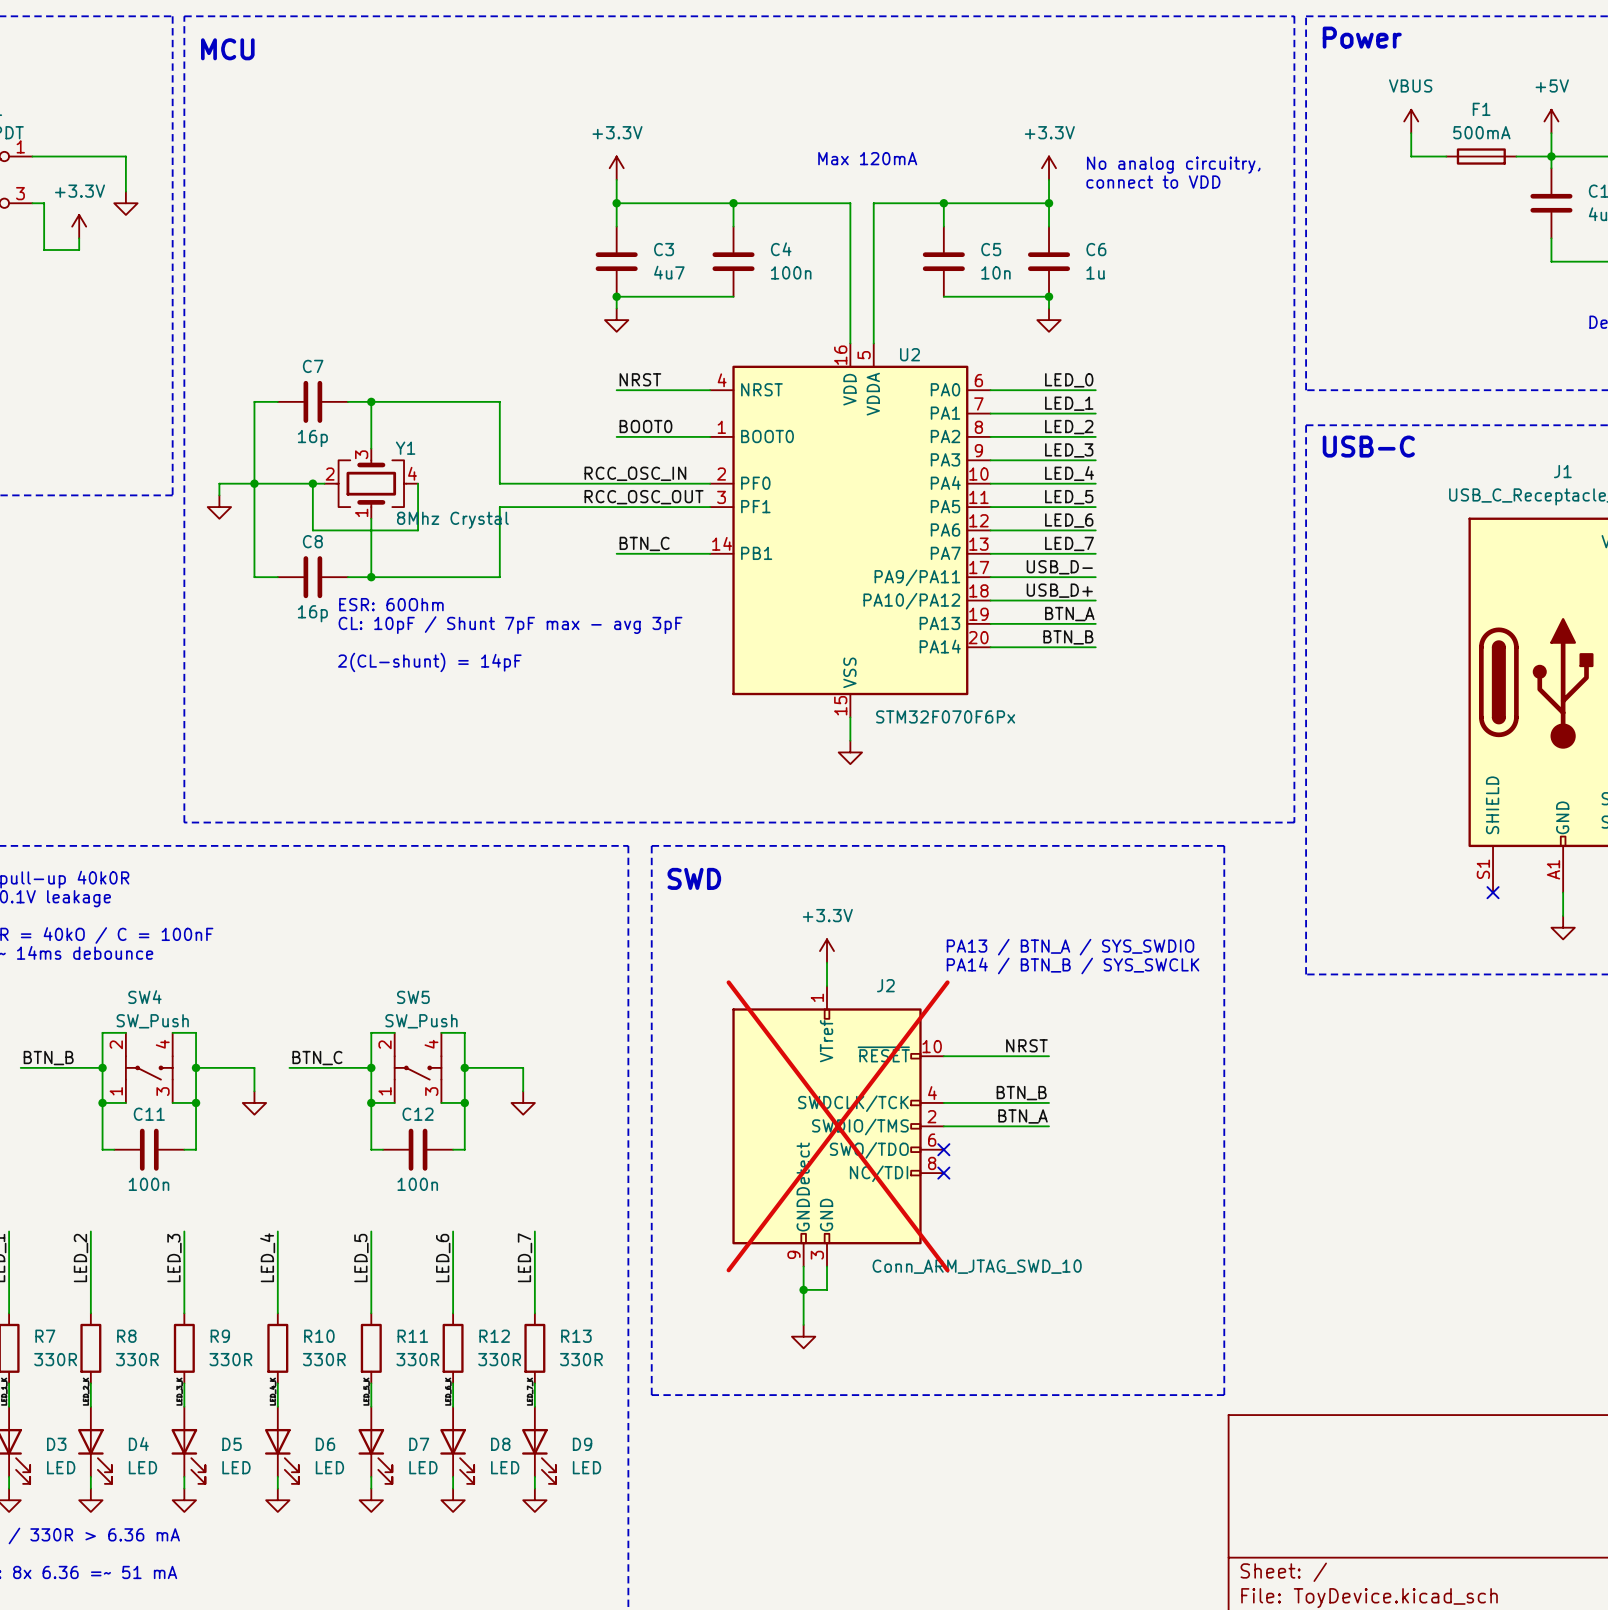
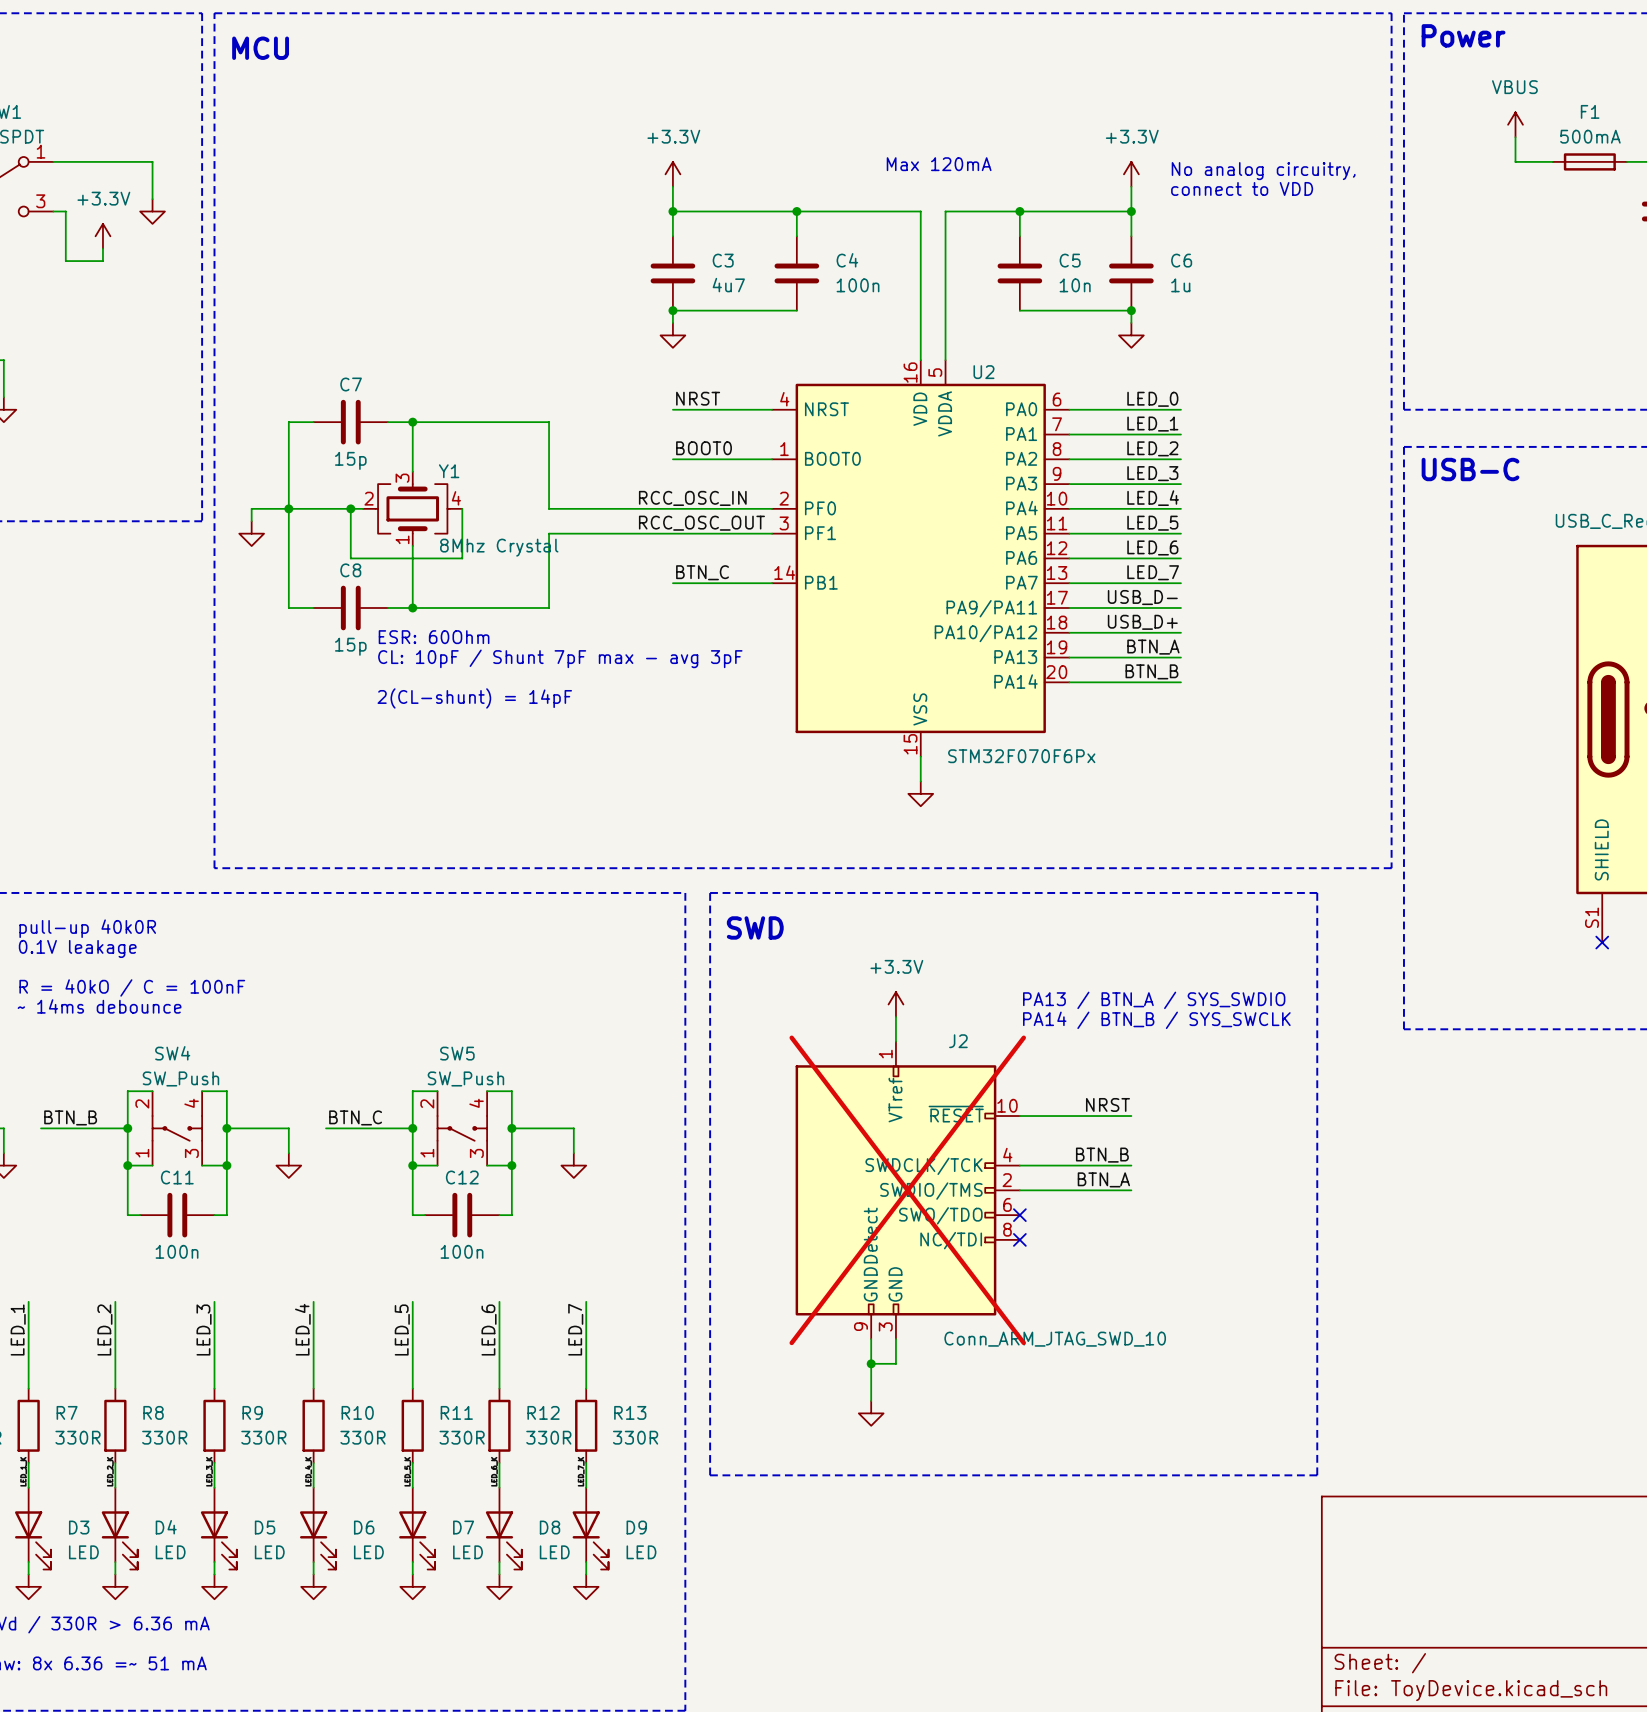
C7 value: 16p (312, 438) -> 15p (350, 460)
C8 value: 16p (312, 613) -> 15p (350, 646)

